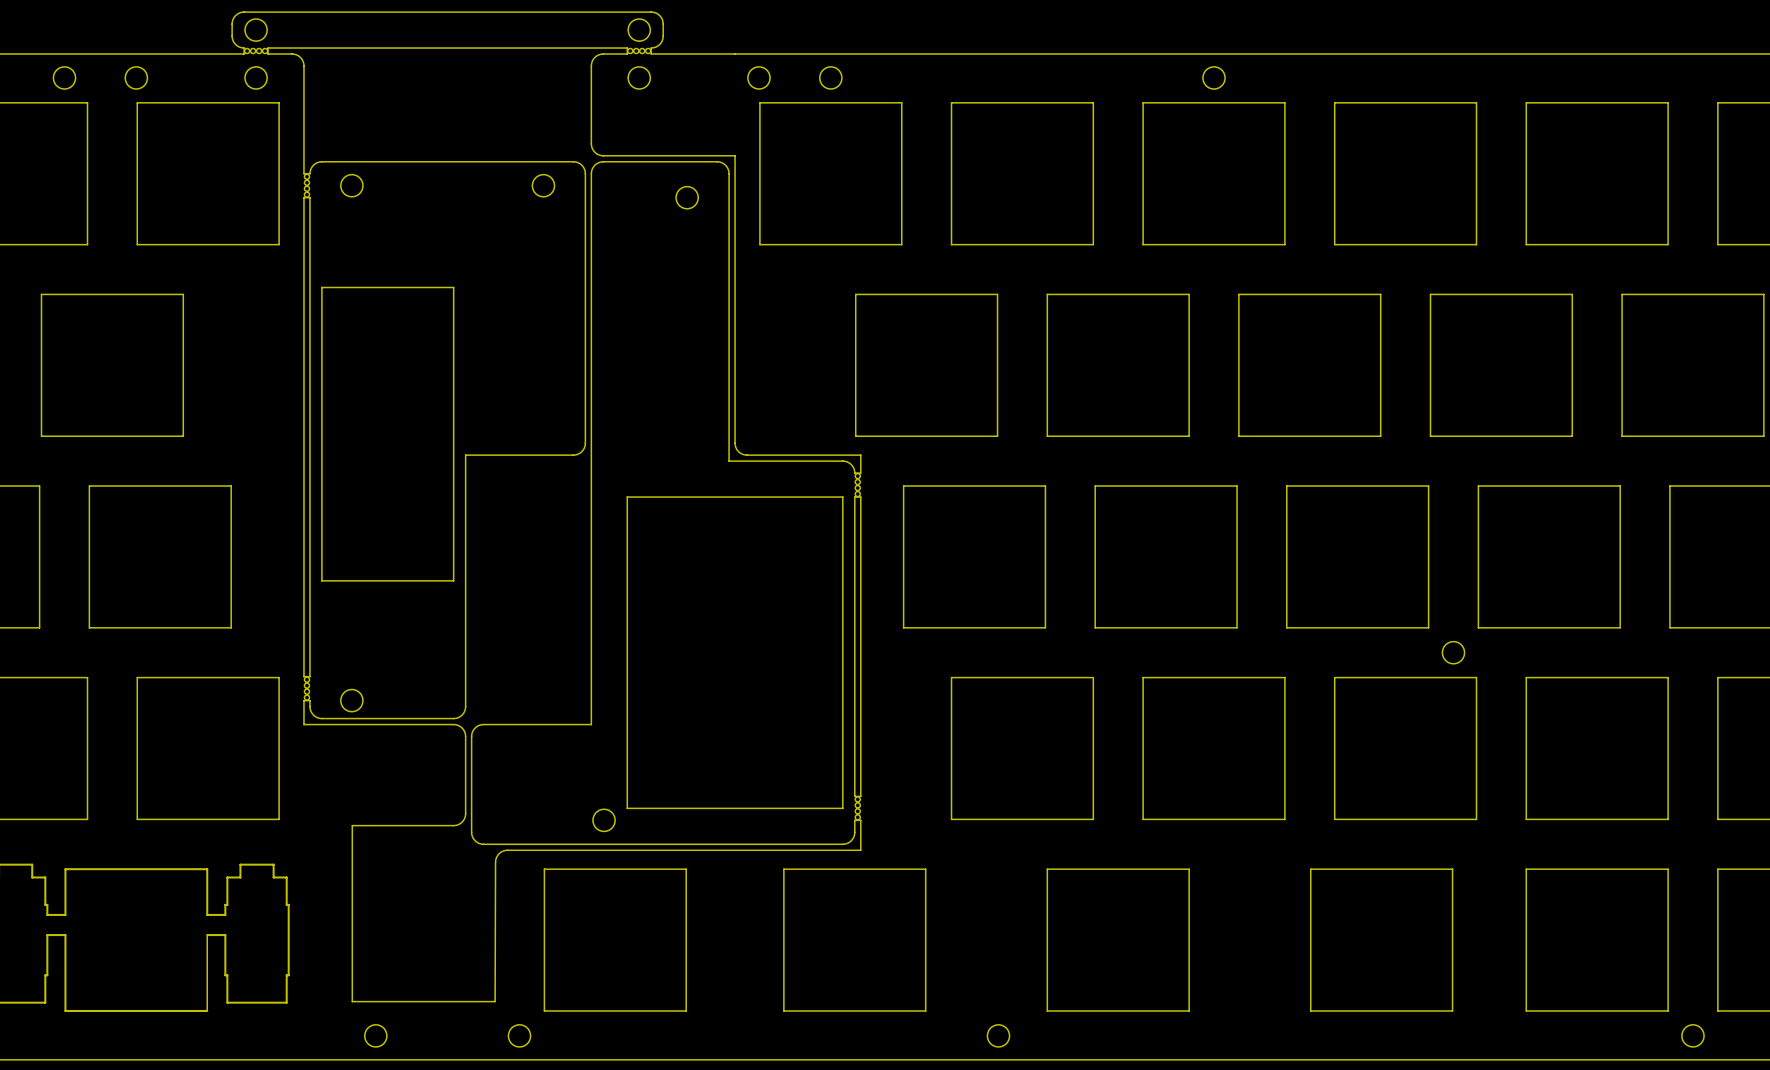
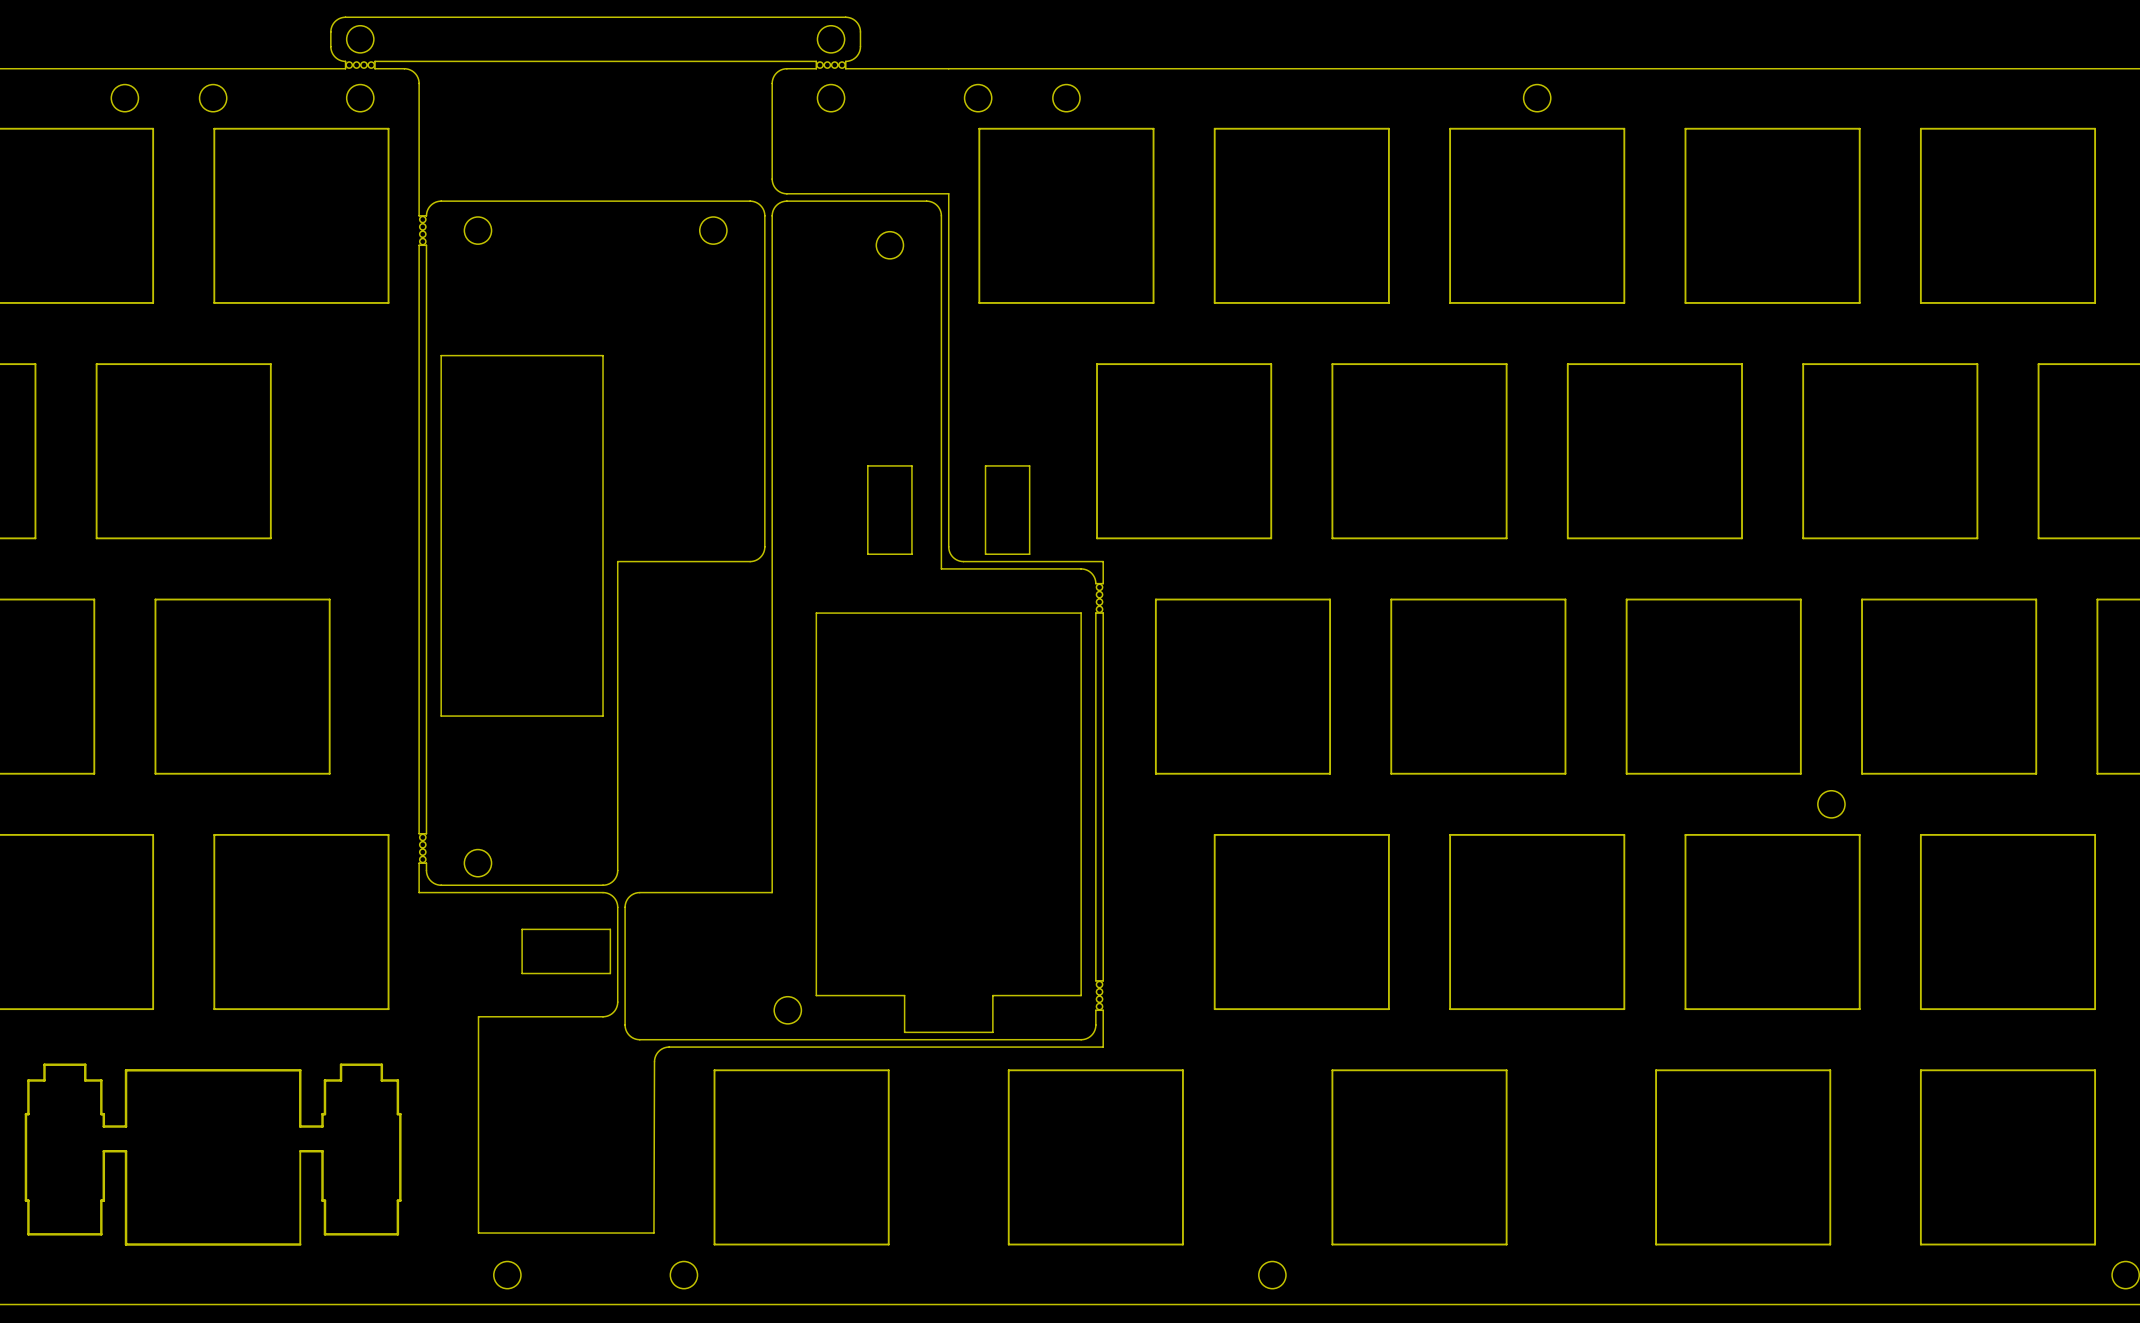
board edge: none -> (867, 465) (911, 465) (911, 554) (867, 554) (867, 465)
board edge: none -> (985, 465) (985, 554) (1029, 554) (1029, 465) (985, 465)
drawing shape: [627, 496, 844, 809] -> [816, 612, 1082, 996]
board edge: none -> (522, 929) (522, 973) (610, 973) (610, 929) (522, 929)
board edge: none -> (904, 995) (904, 1032) (992, 1032) (992, 995)

